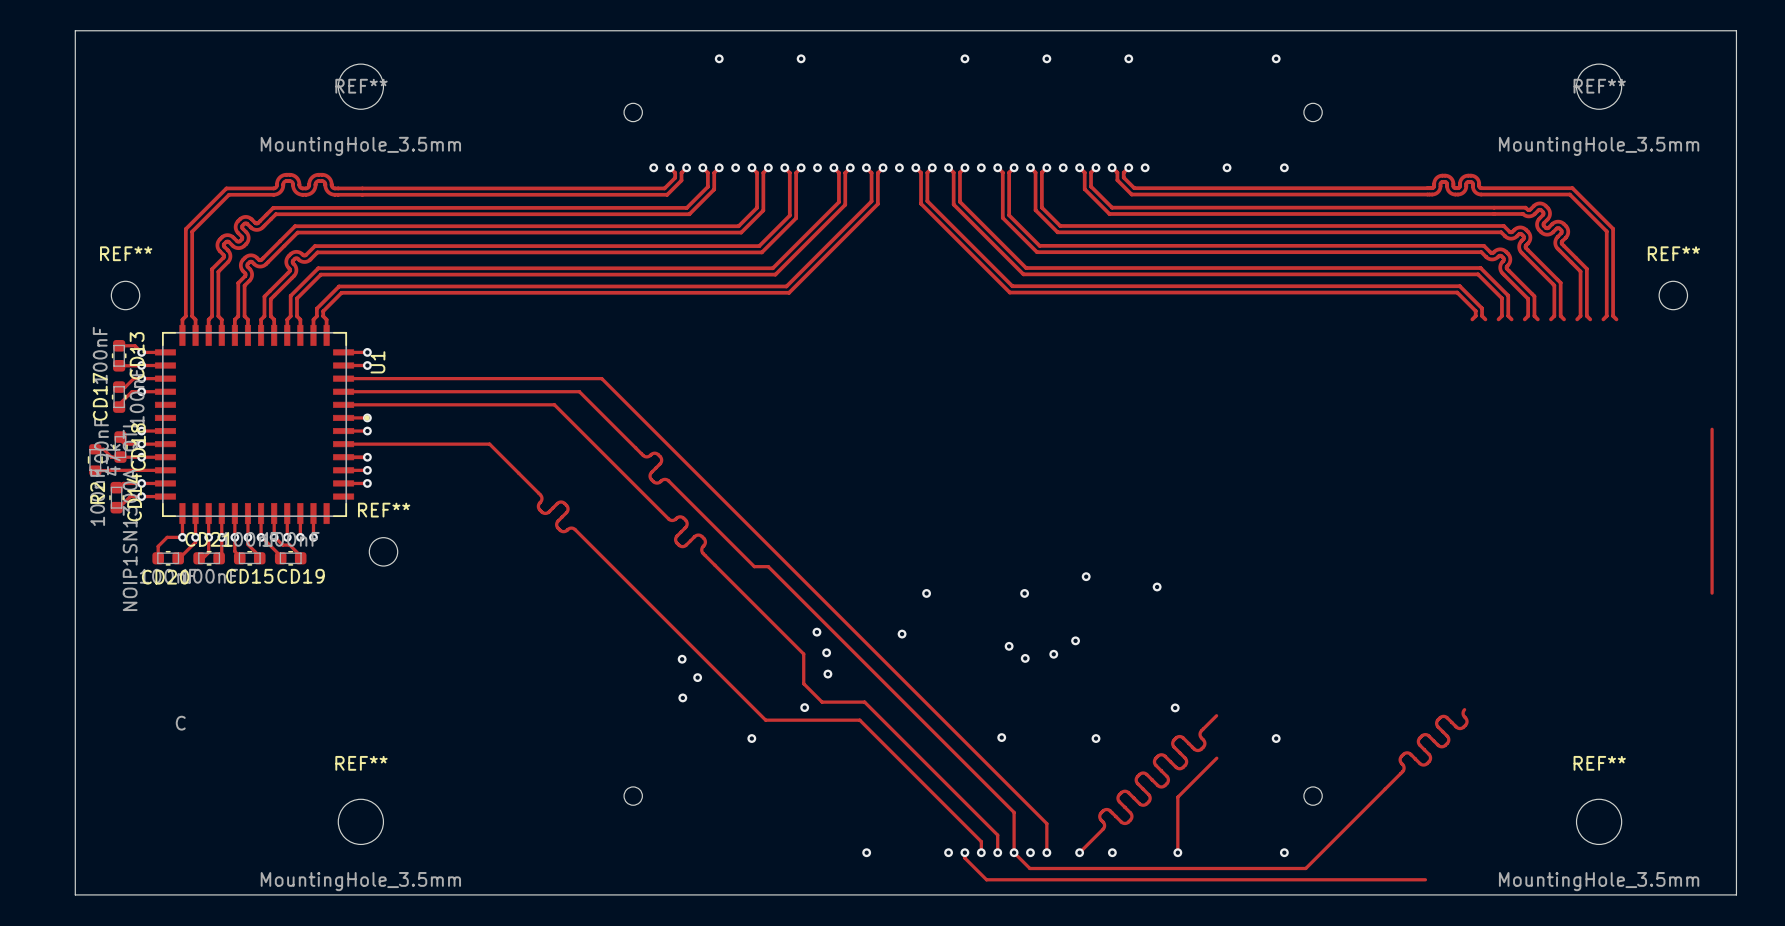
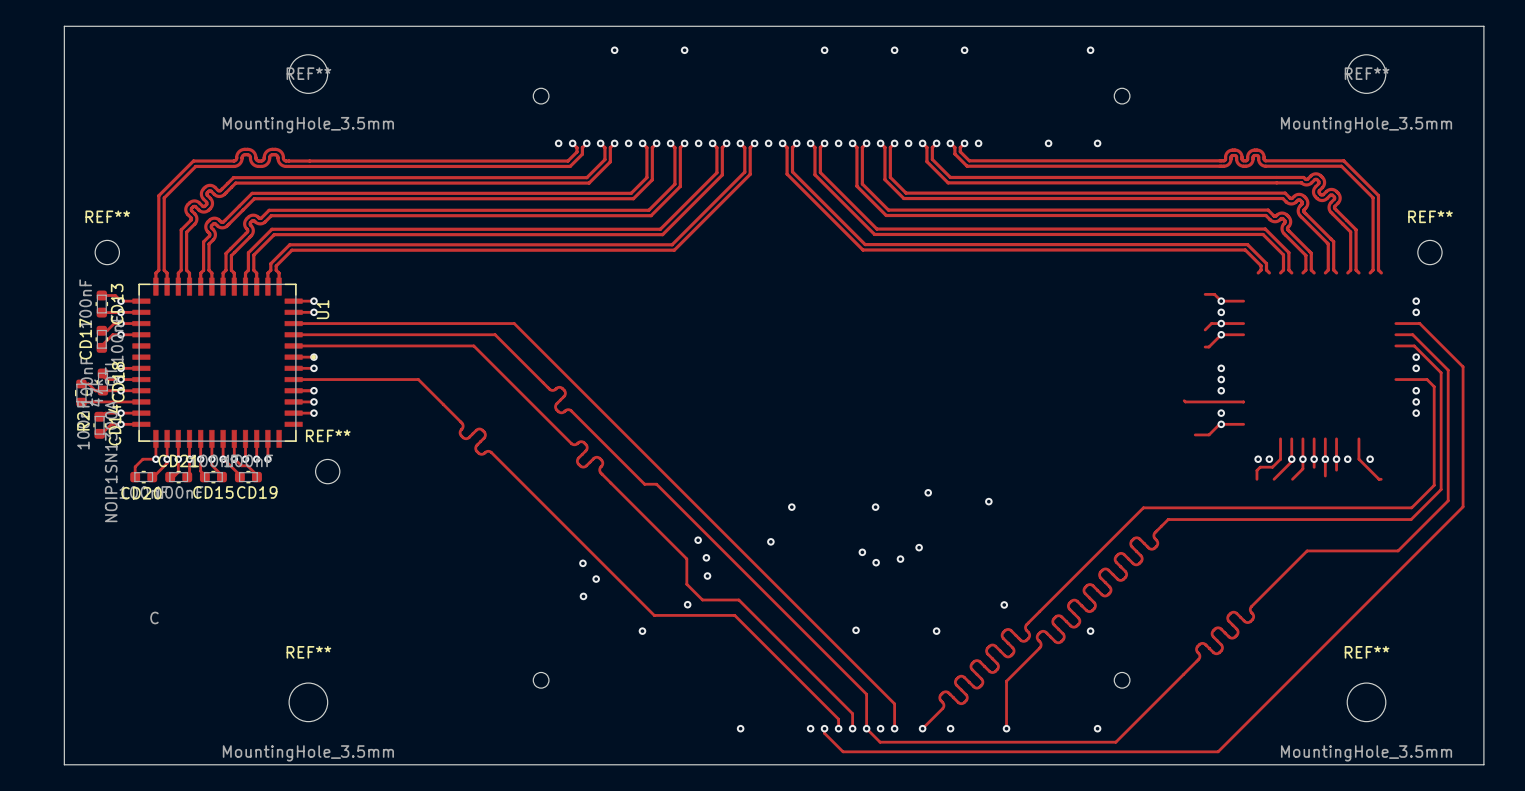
track: none -> (1205, 294) (1214, 294) (1221, 301) (1243, 301)
via: none -> (1221, 301)
via: none -> (1416, 301)
via: none -> (1221, 312)
via: none -> (1416, 312)
via: none -> (1221, 323)
track: none -> (1243, 323) (1211, 323) (1205, 329)
track: none -> (1395, 323) (1419, 323) (1463, 366)
via: none -> (1221, 334)
track: none -> (1243, 334) (1221, 334) (1208, 347) (1205, 347)
track: none -> (1395, 334) (1412, 334) (1448, 370) (1448, 500) (1398, 550) (1307, 550) (1251, 606)
track: none -> (1395, 345) (1414, 345) (1441, 372) (1441, 489) (1411, 519) (1168, 519) (1154, 534) (1157, 543) (1154, 548) (1149, 548) (1138, 538) (1131, 541) (1131, 546) (1141, 557) (1138, 563) (1134, 564) (1122, 553) (1116, 556) (1115, 561) (1126, 573) (1123, 579) (1118, 579) (1106, 569) (1100, 572) (1100, 577) (1110, 588) (1107, 595) (1102, 595) (1091, 584) (1084, 587) (1084, 592) (1095, 604) (1092, 610) (1087, 611) (1076, 600) (1069, 602) (1068, 608) (1078, 618) (1079, 623) (1072, 627) (1060, 616) (1056, 616) (1053, 623) (1063, 634) (1063, 639) (1056, 642) (1045, 632) (1041, 631) (1037, 636) (1041, 643) (1039, 647)
via: none -> (1416, 357)
via: none -> (1221, 368)
via: none -> (1416, 368)
via: none -> (1221, 379)
track: none -> (1395, 379) (1427, 379) (1434, 386) (1434, 485) (1411, 507) (1143, 507) (1039, 611)
via: none -> (1221, 390)
via: none -> (1416, 390)
track: none -> (1184, 400) (1243, 402)
via: none -> (1416, 401)
via: none -> (1221, 413)
via: none -> (1416, 413)
via: none -> (1221, 424)
track: none -> (1243, 424) (1219, 424) (1209, 434) (1195, 434)
track: none -> (1280, 438) (1280, 459) (1272, 467) (1260, 467) (1256, 470) (1256, 479)
track: none -> (1291, 438) (1291, 461) (1274, 479)
track: none -> (1302, 438) (1302, 468) (1292, 479)
track: none -> (1314, 438) (1314, 467)
track: none -> (1325, 438) (1325, 476)
track: none -> (1336, 438) (1336, 470)
track: none -> (1358, 438) (1358, 459) (1381, 479)
via: none -> (1258, 459)
via: none -> (1269, 459)
via: none -> (1291, 459)
via: none -> (1302, 459)
via: none -> (1314, 459)
via: none -> (1325, 459)
via: none -> (1336, 459)
via: none -> (1347, 459)
via: none -> (1370, 459)
track: none -> (1463, 506) (1218, 751)

